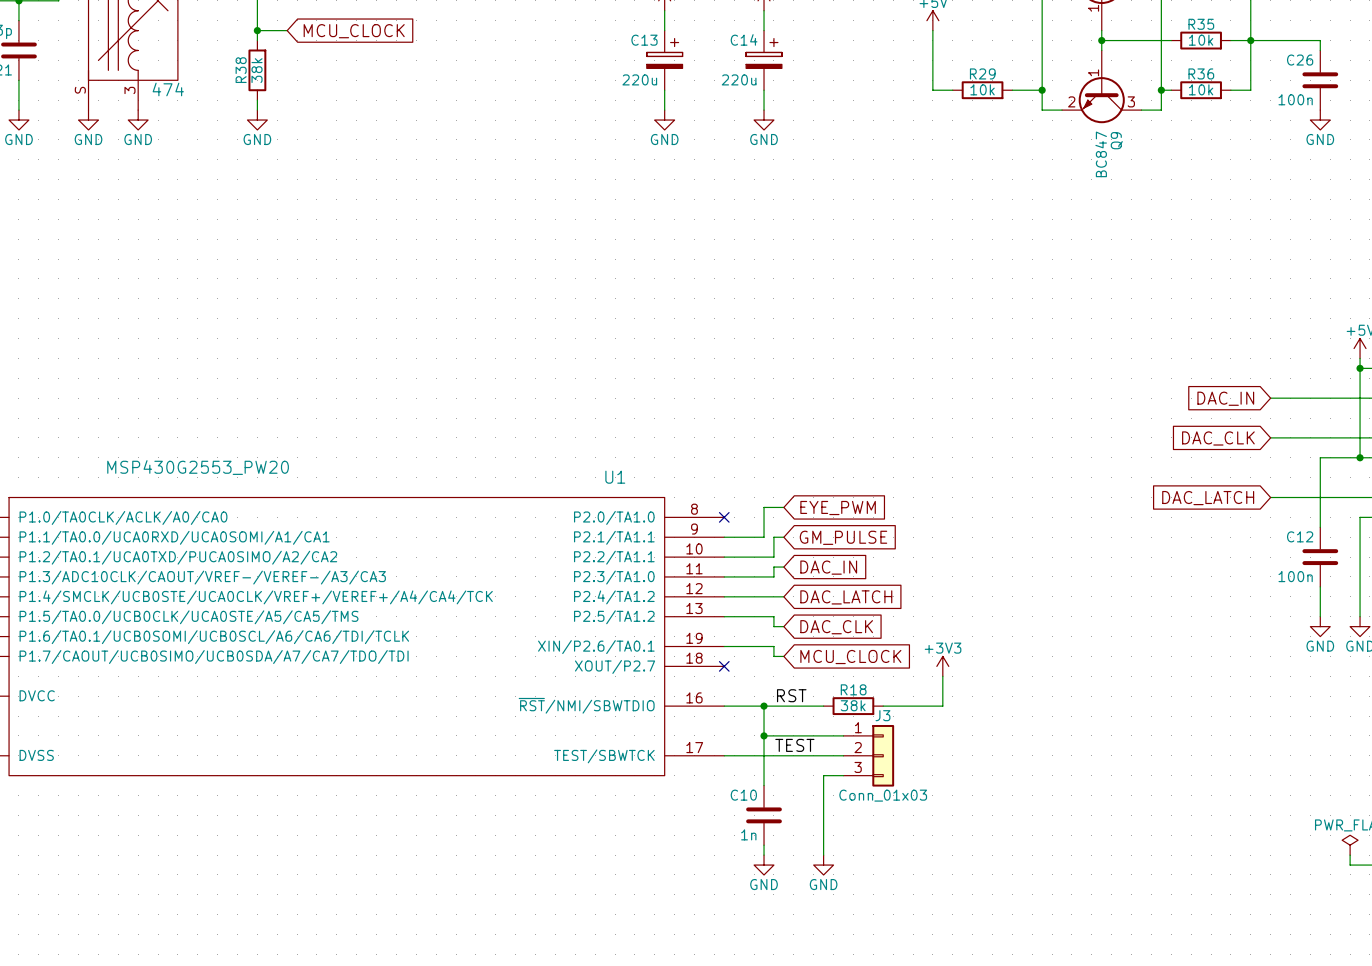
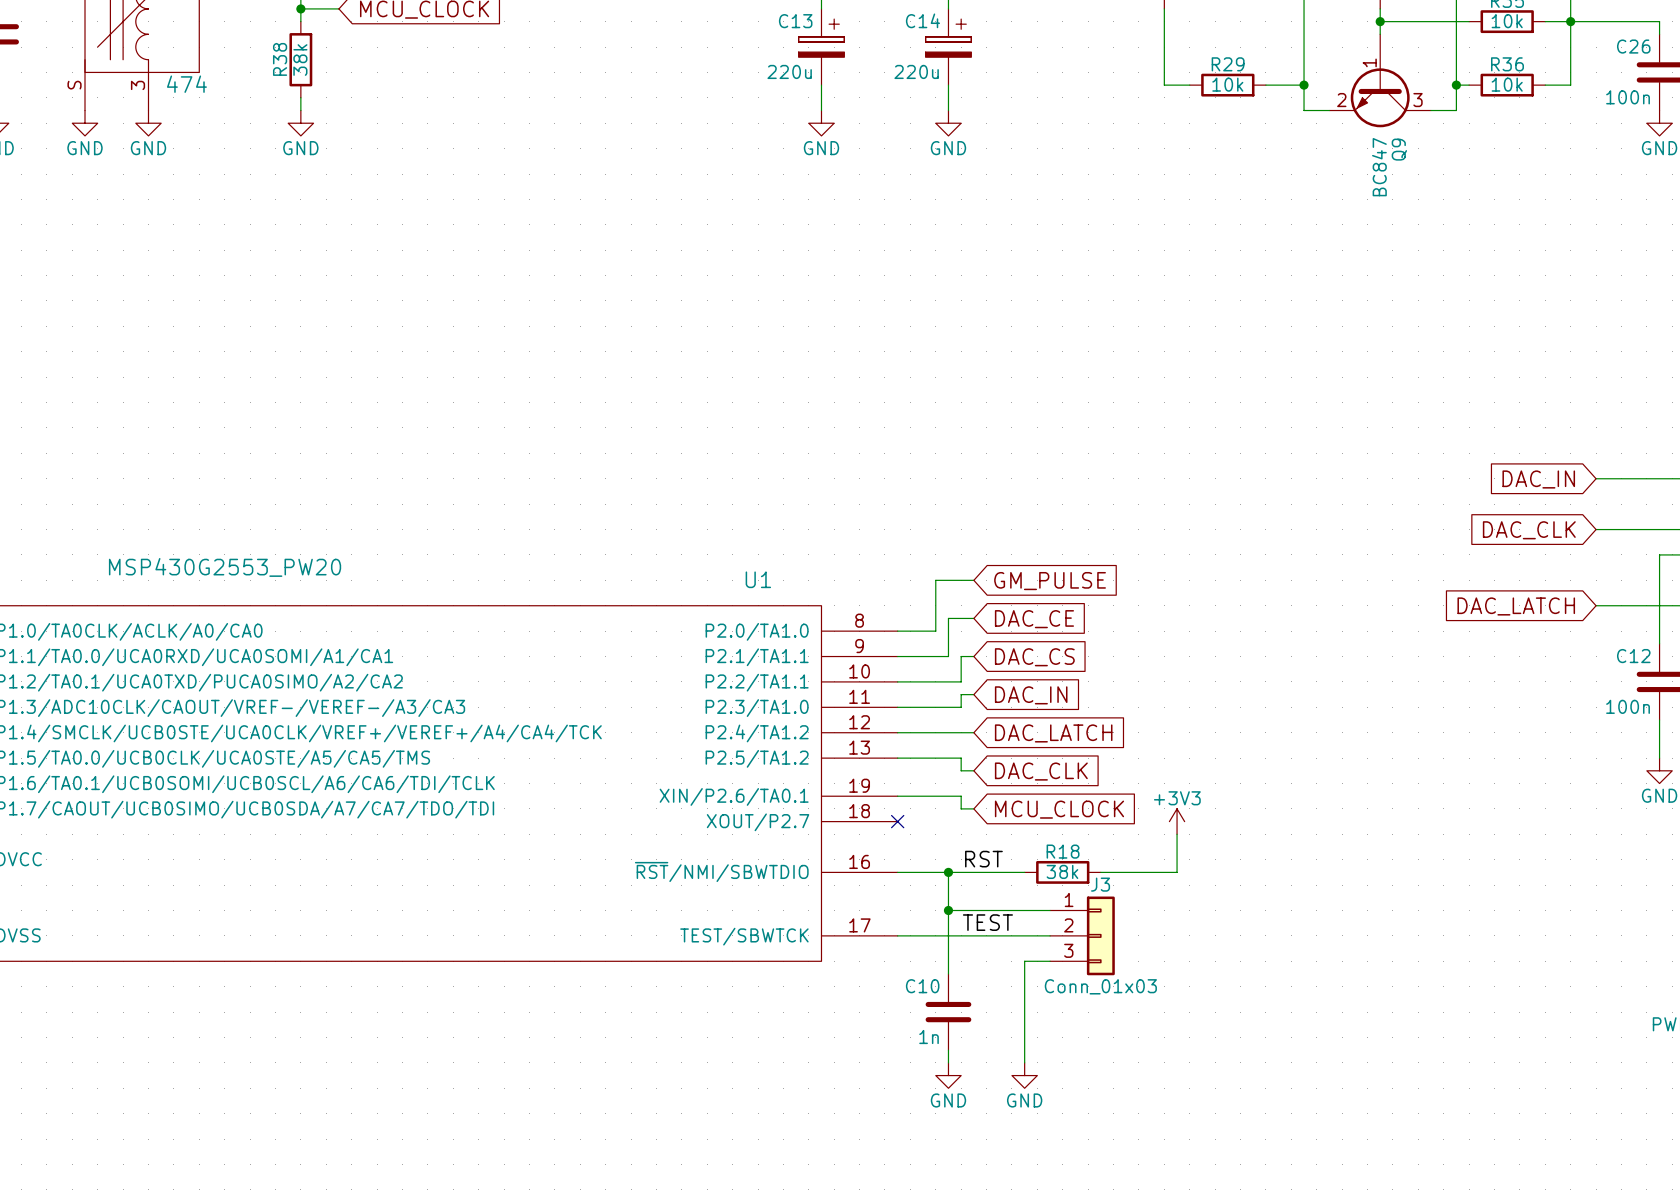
wire: none -> (973, 580) (935, 580) (935, 631) (897, 631)
global label: none -> GM_PULSE (1050, 581)
global label: EYE_PWM (838, 508) -> DAC_CE (1034, 619)
no-connect mark: (724, 517) -> none
global label: GM_PULSE (843, 537) -> DAC_CS (1034, 657)

